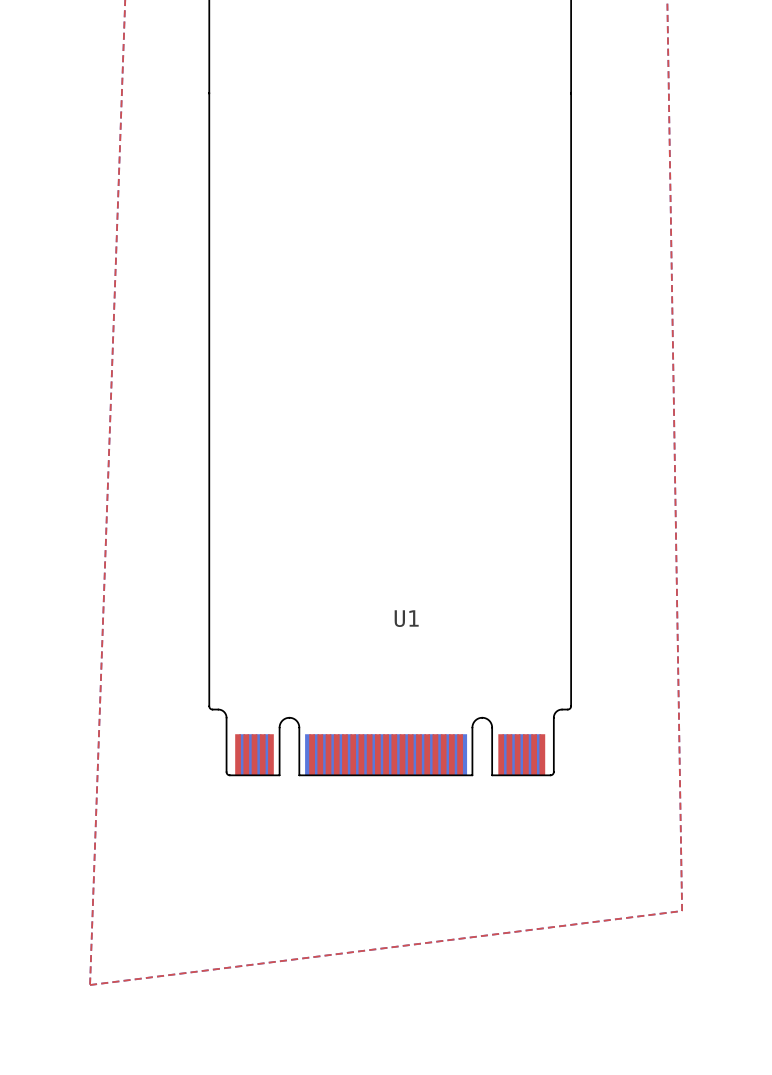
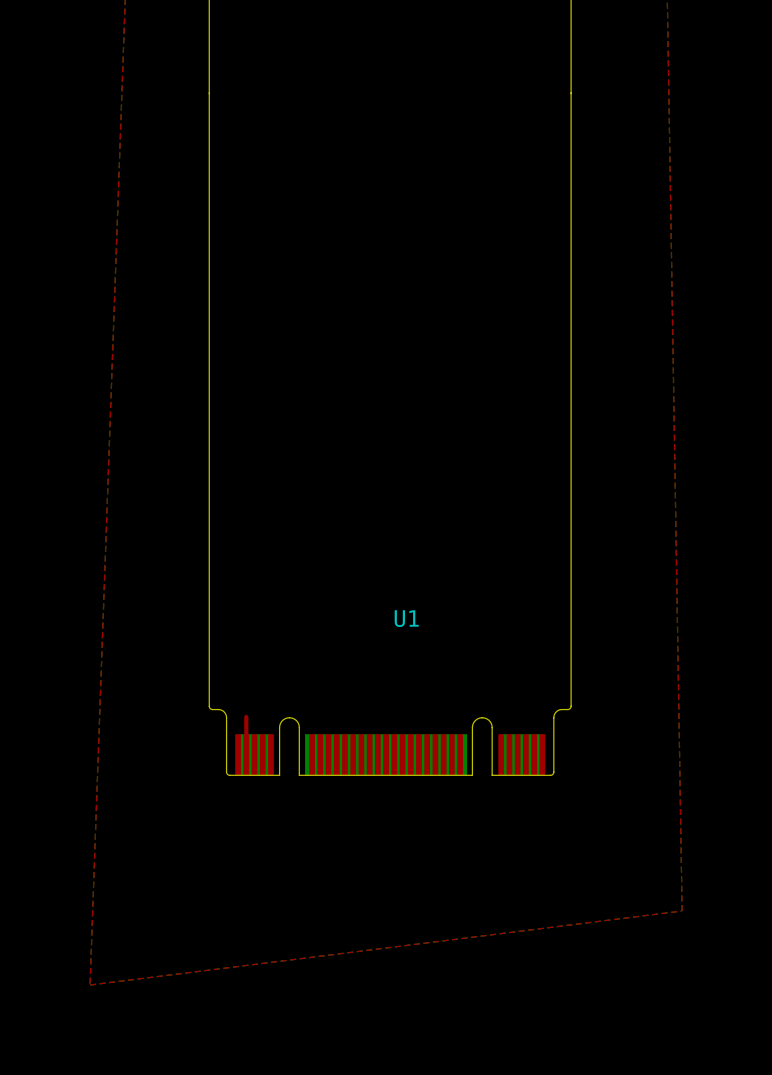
top track: none -> (246, 716) (246, 754)

